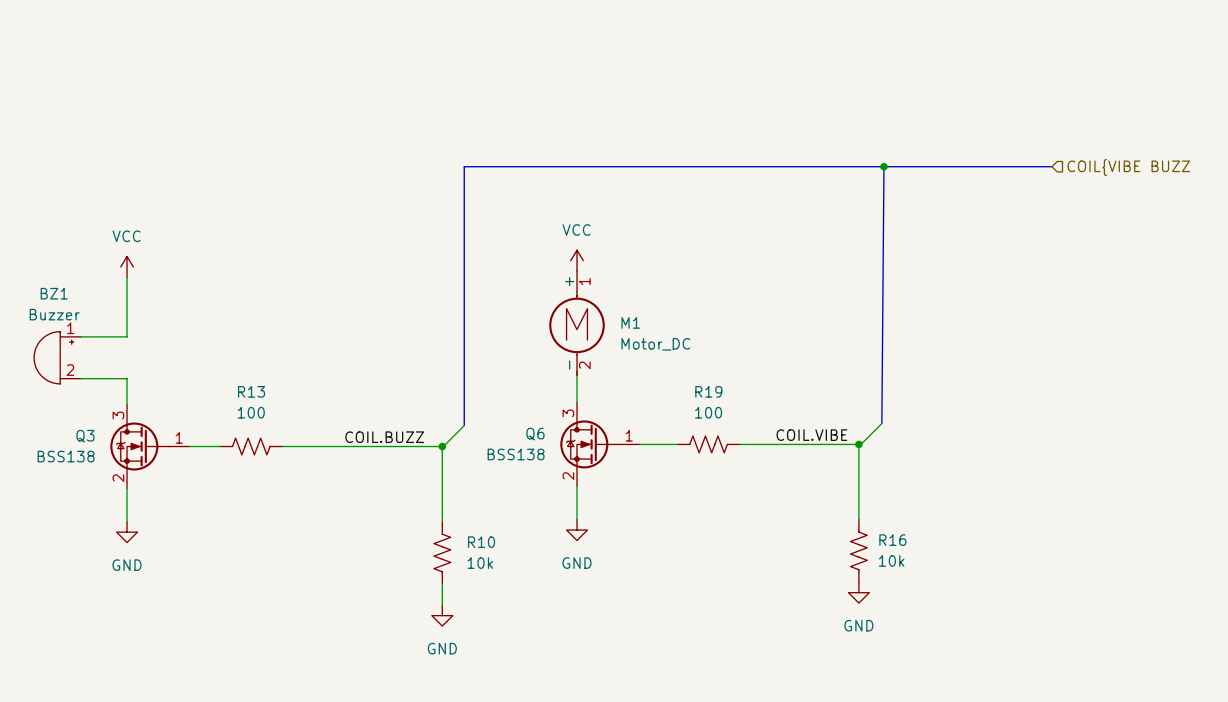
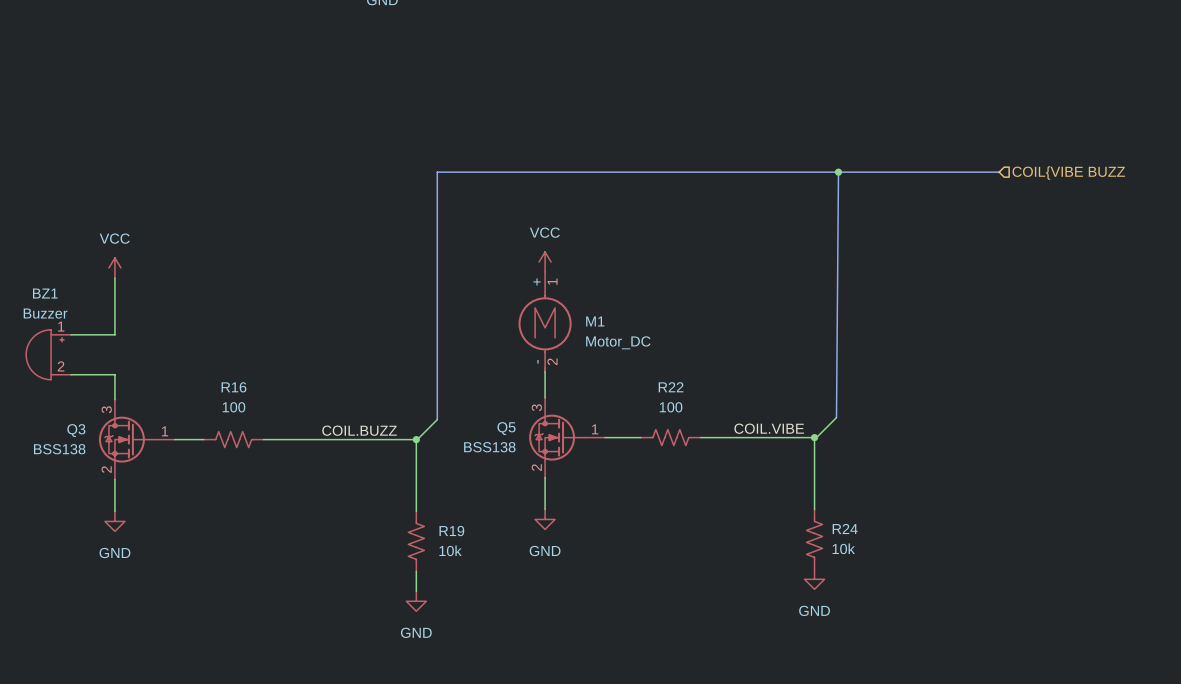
R13 name: R13 (251, 391) -> R16 (233, 387)
R19 name: R19 (708, 391) -> R22 (671, 387)
Q6 name: Q6 (535, 434) -> Q5 (506, 428)
R16 name: R16 (892, 540) -> R24 (845, 528)
R10 name: R10 (481, 542) -> R19 (451, 531)

